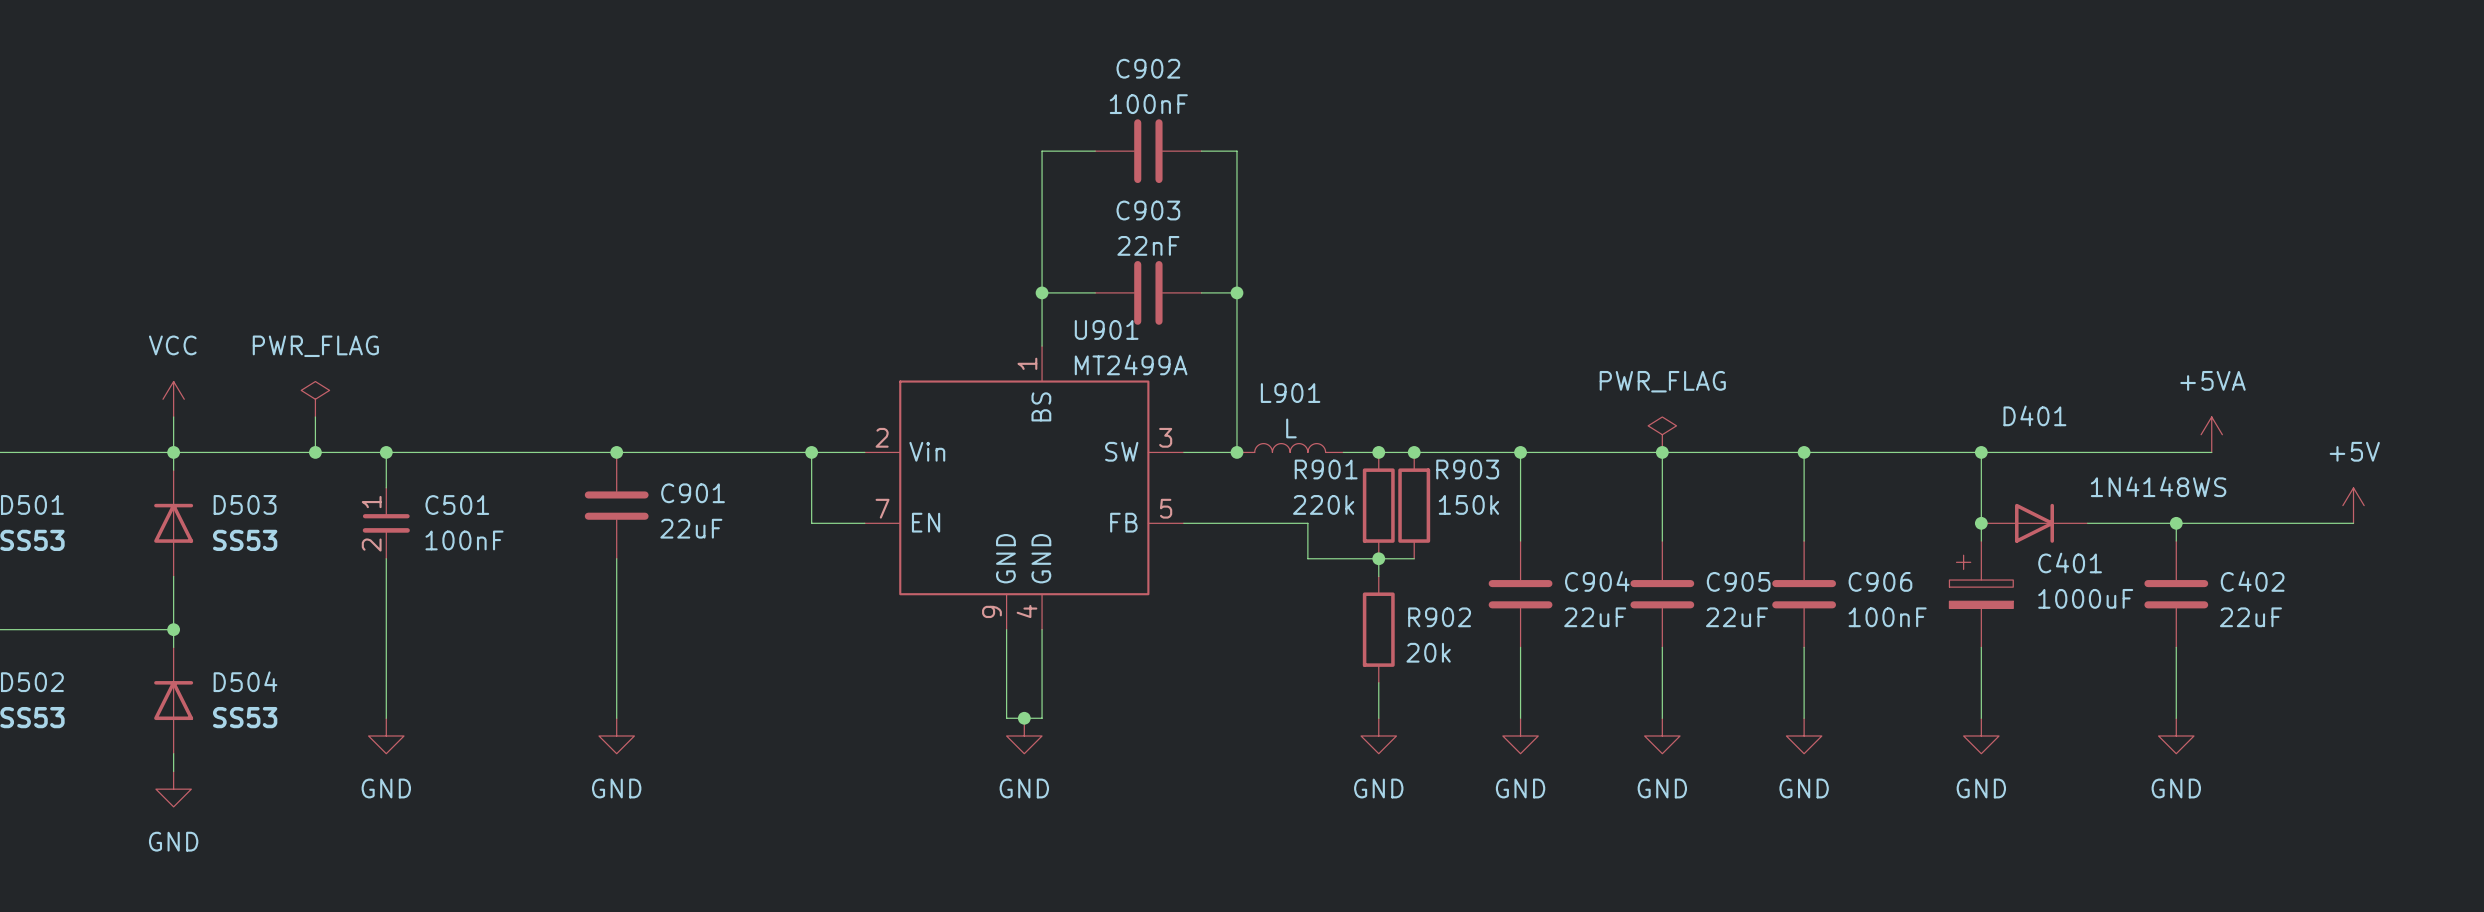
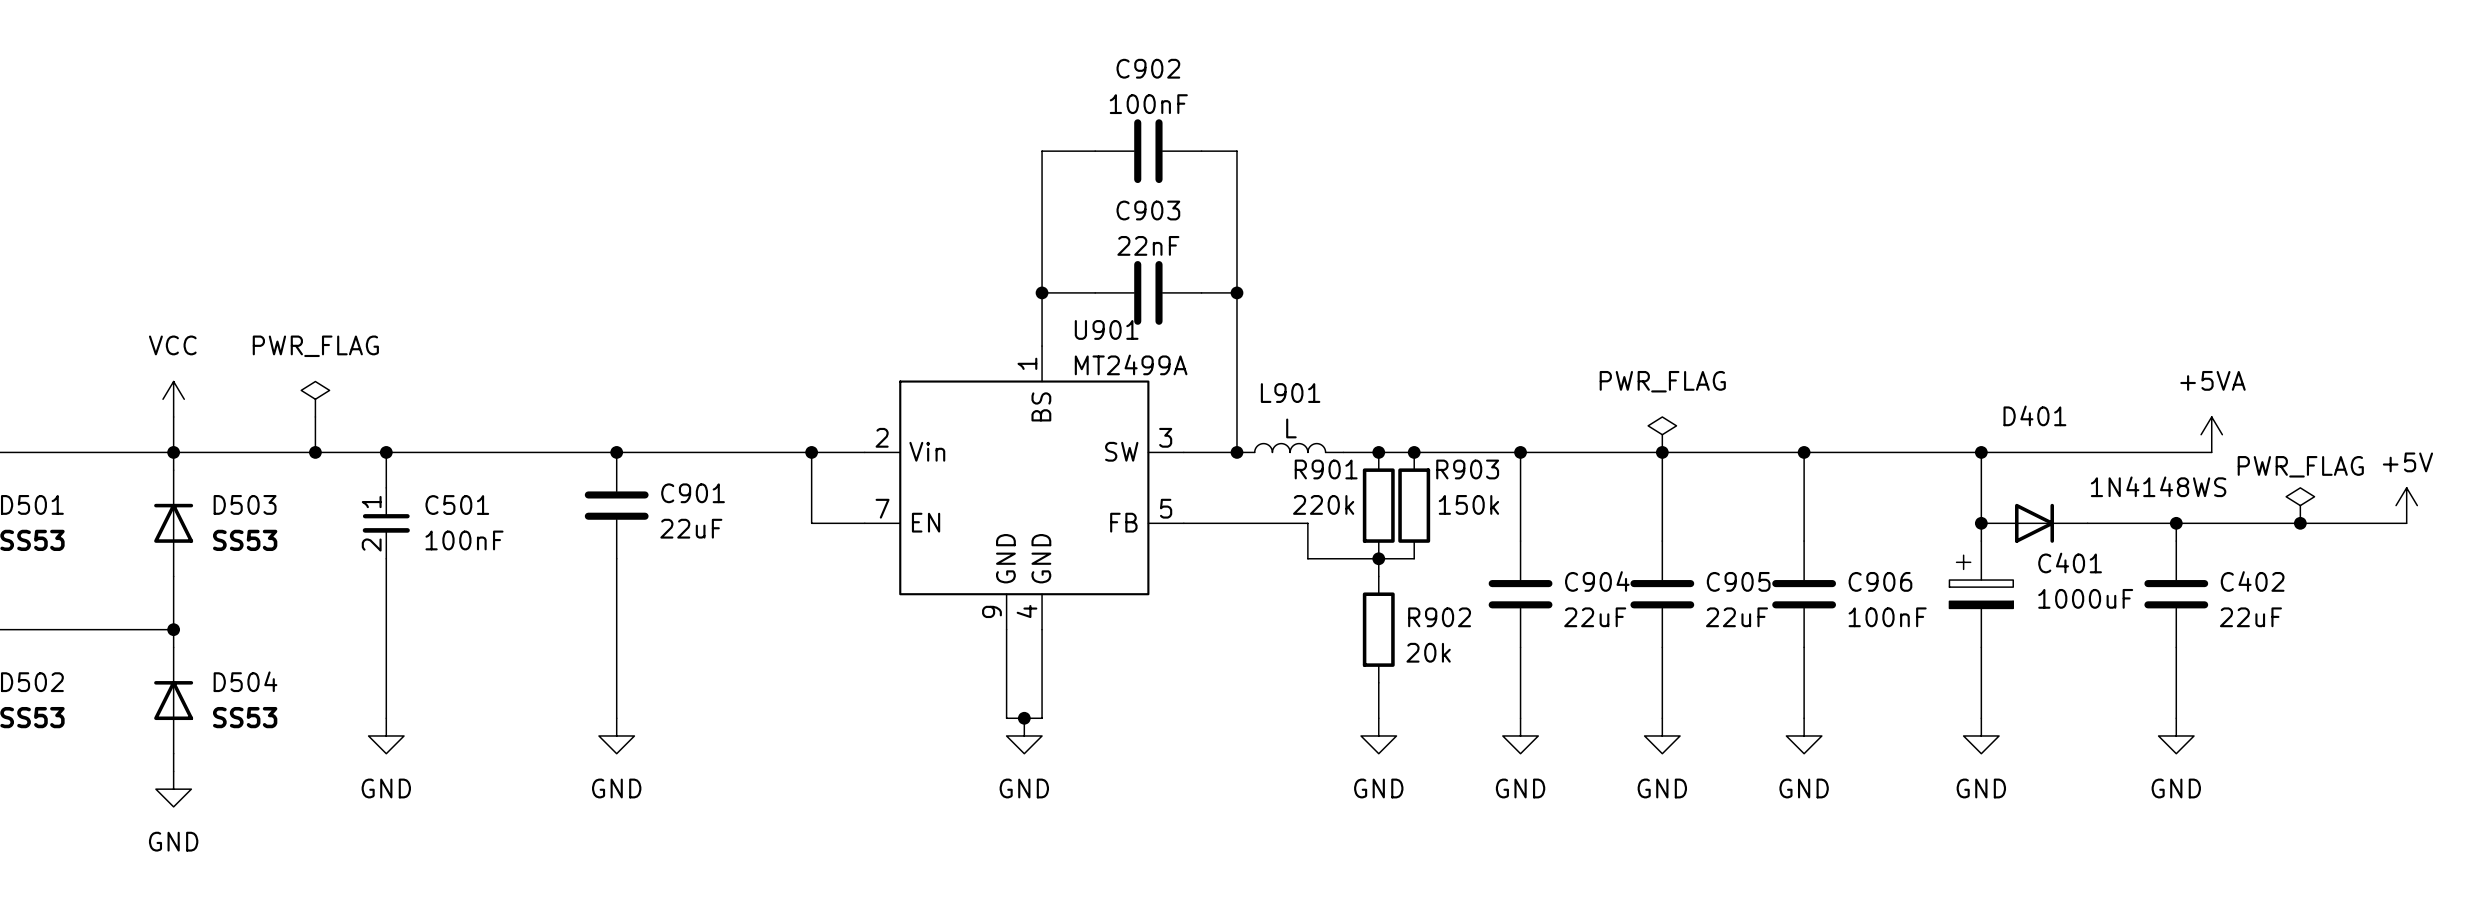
power symbol text position: +5V (2354, 451) -> +5V (2407, 462)
power symbol: none -> PWR_FLAG (2300, 505)
power symbol position: +5V (2353, 505) -> +5V (2406, 505)
junction: none -> (2300, 523)
wire: none -> (2353, 523) (2406, 523)

